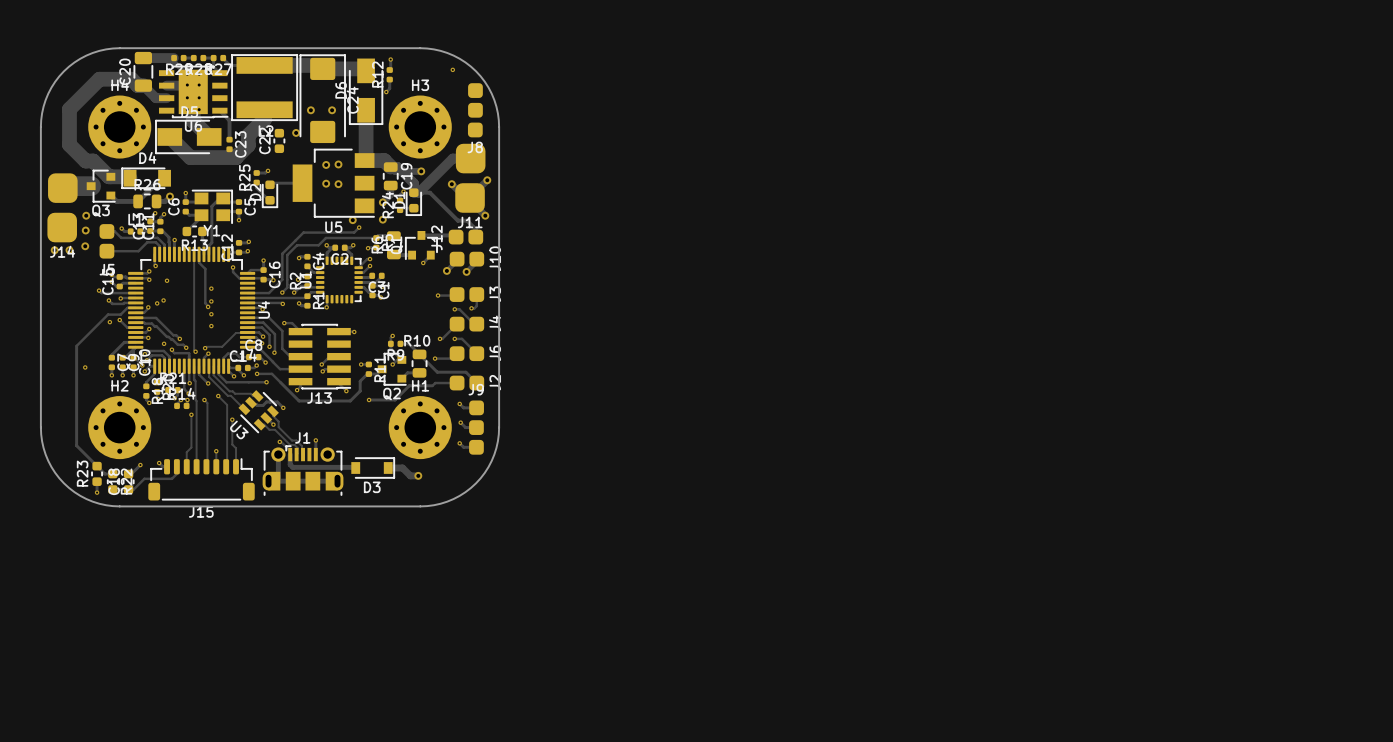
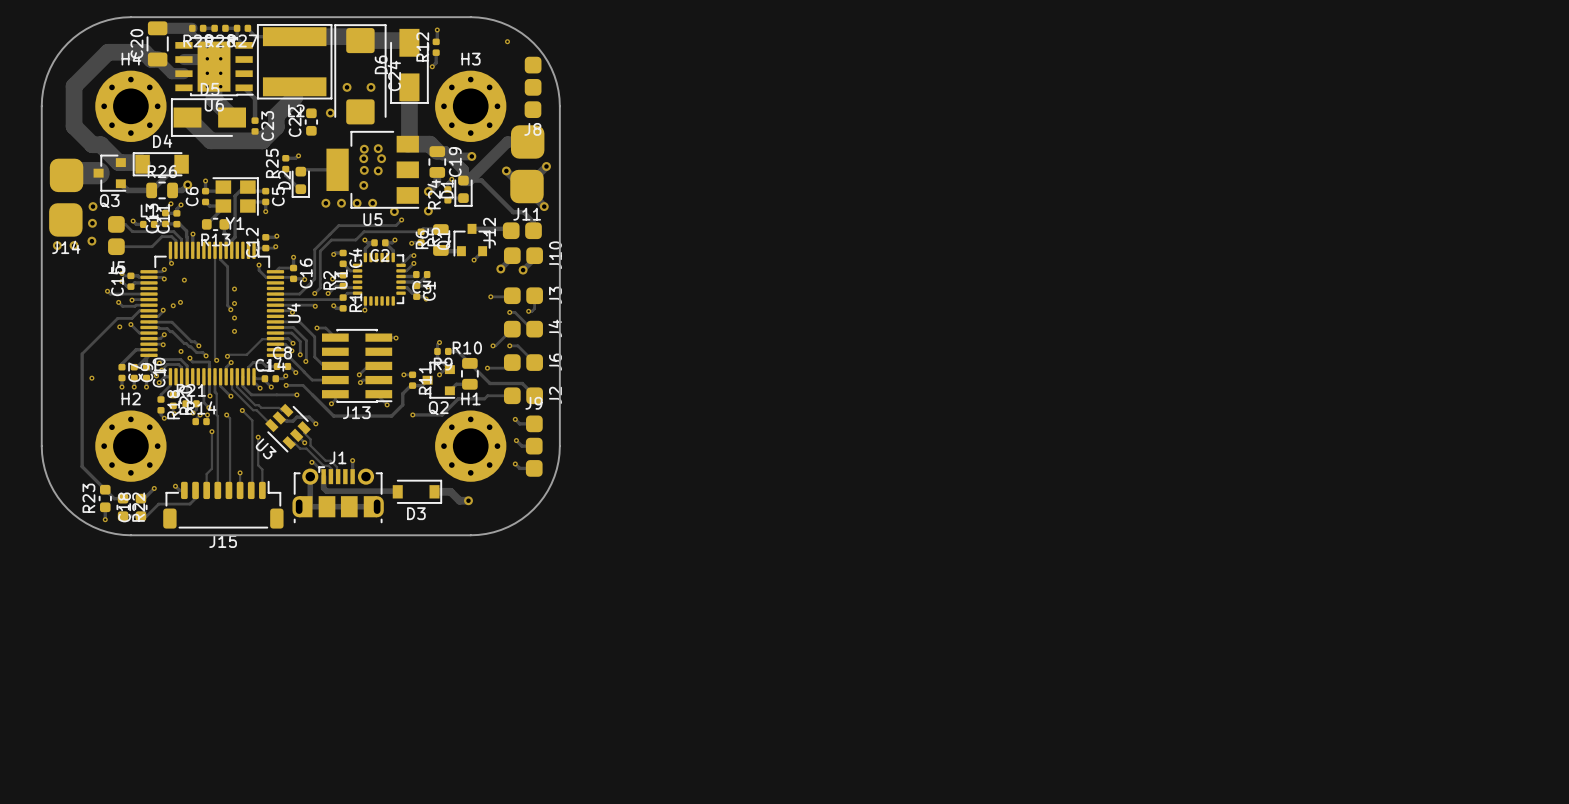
via: none -> (363, 158)
via: none -> (381, 158)
via: none -> (363, 185)
via: none -> (325, 203)
via: none -> (341, 203)
via: none -> (357, 203)
via: none -> (372, 203)

